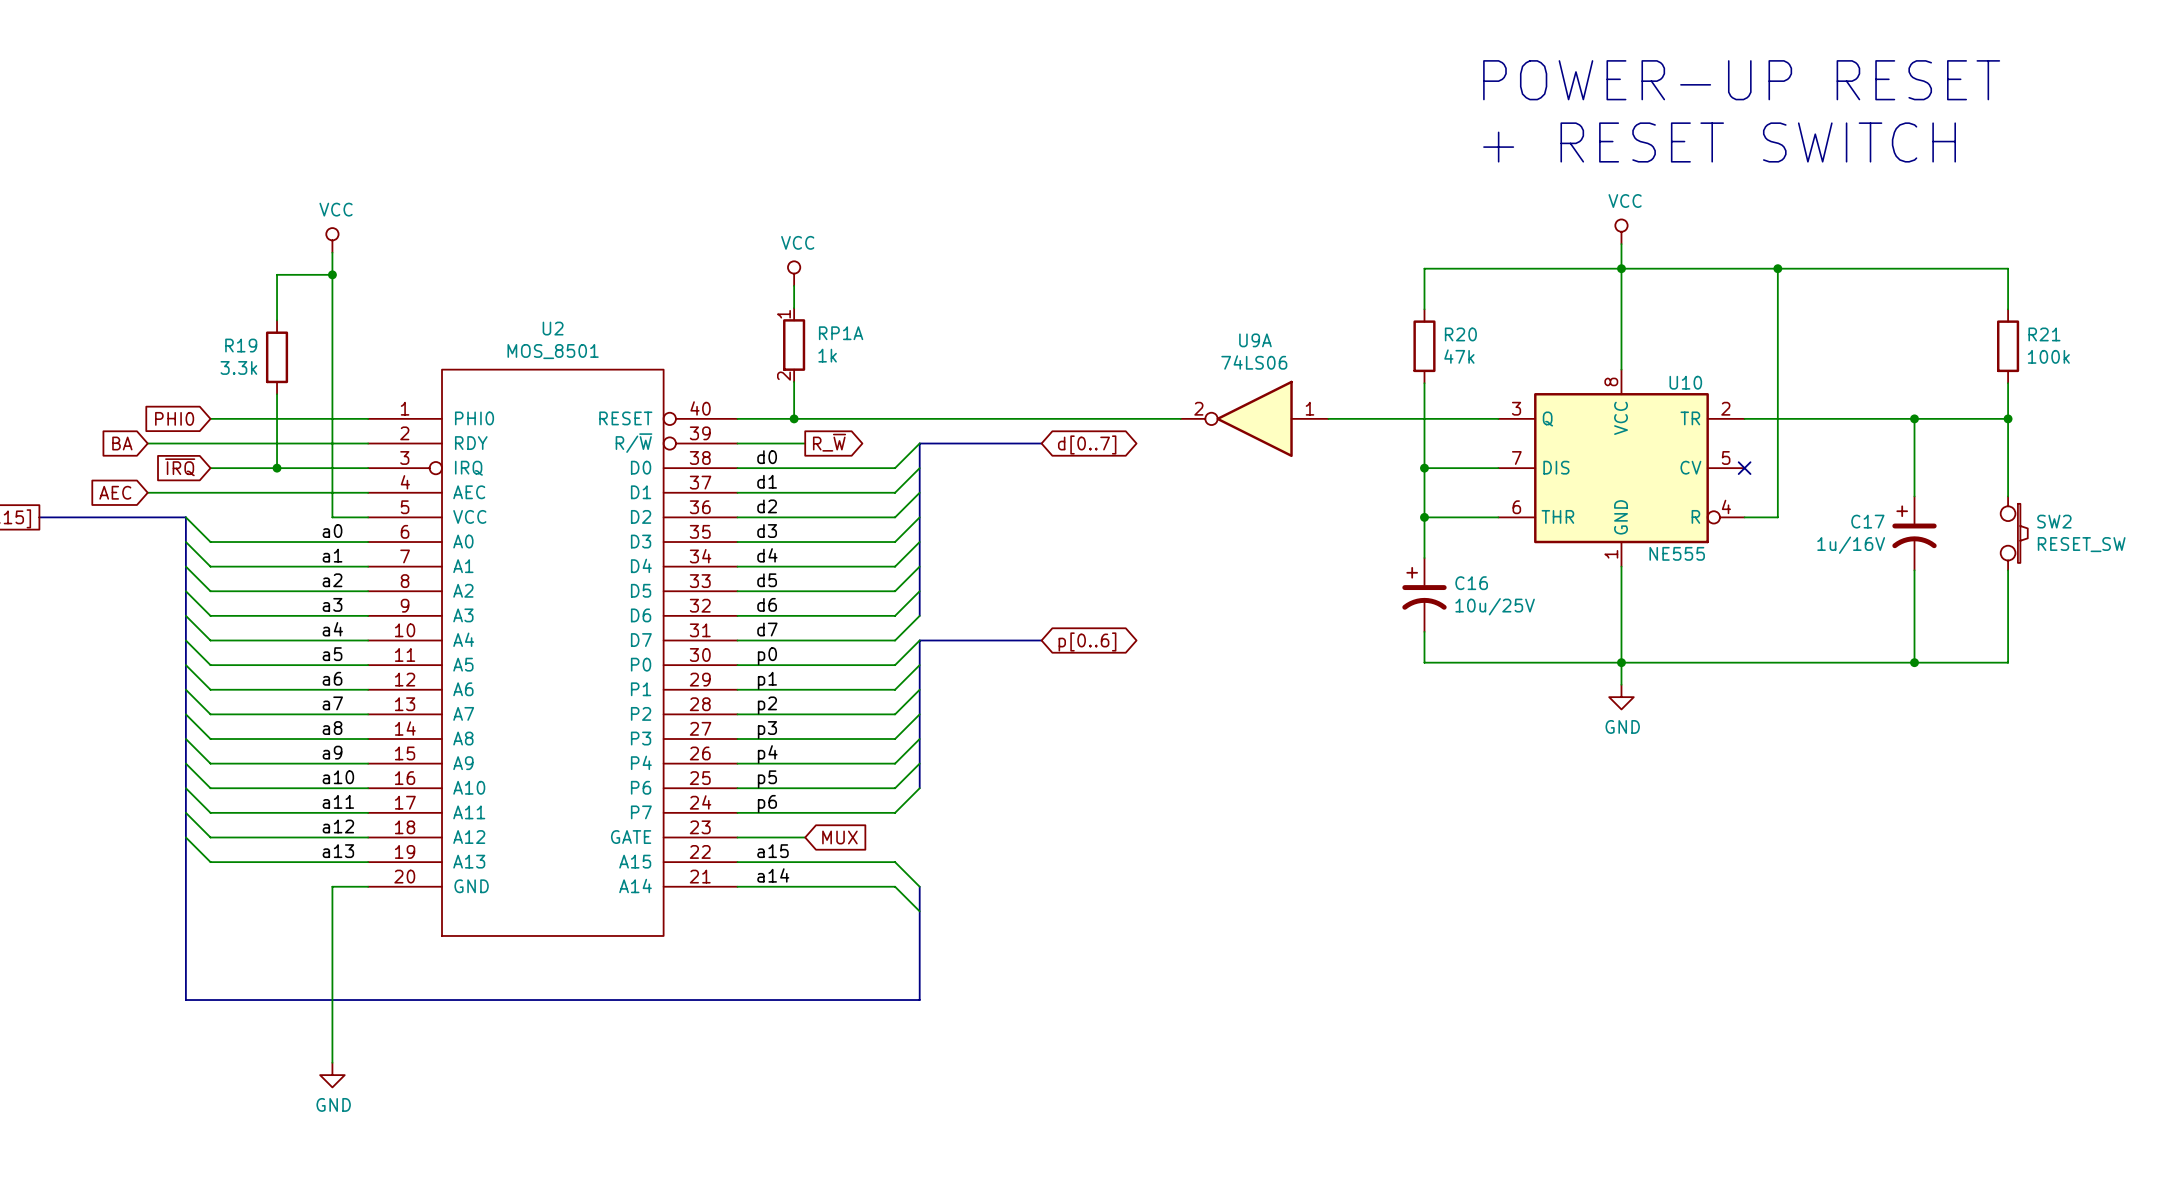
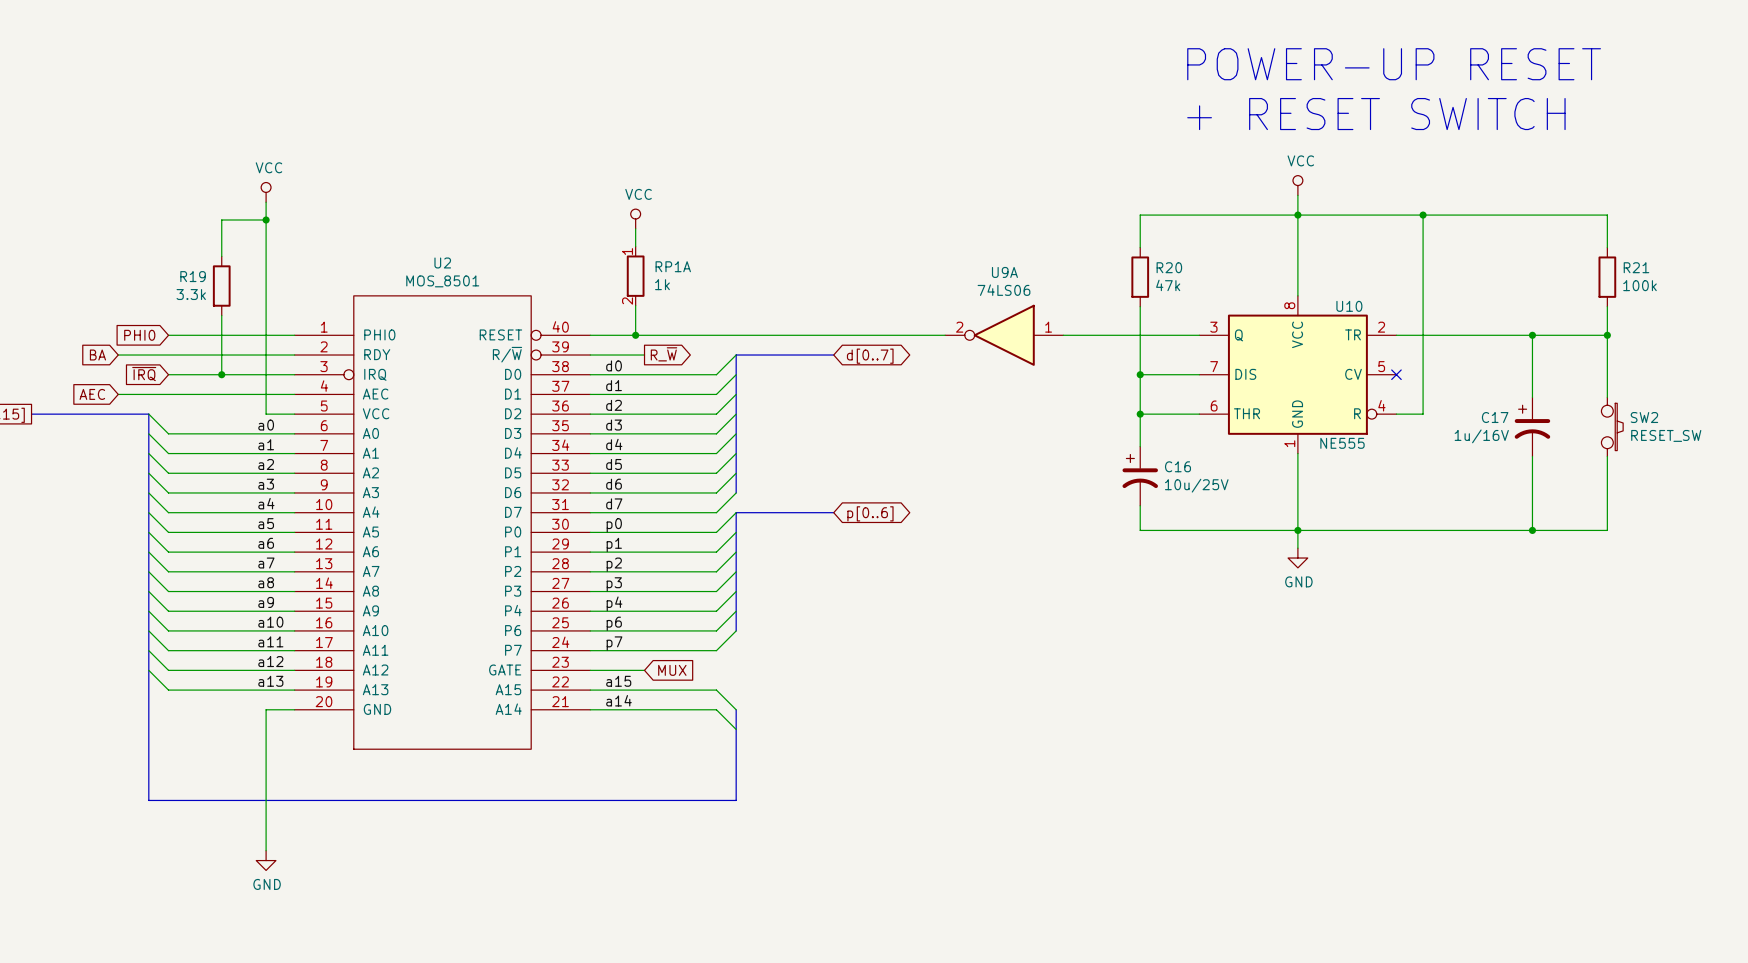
label: p5 (767, 779) -> p6 (614, 623)
label: p6 (767, 803) -> p7 (614, 643)

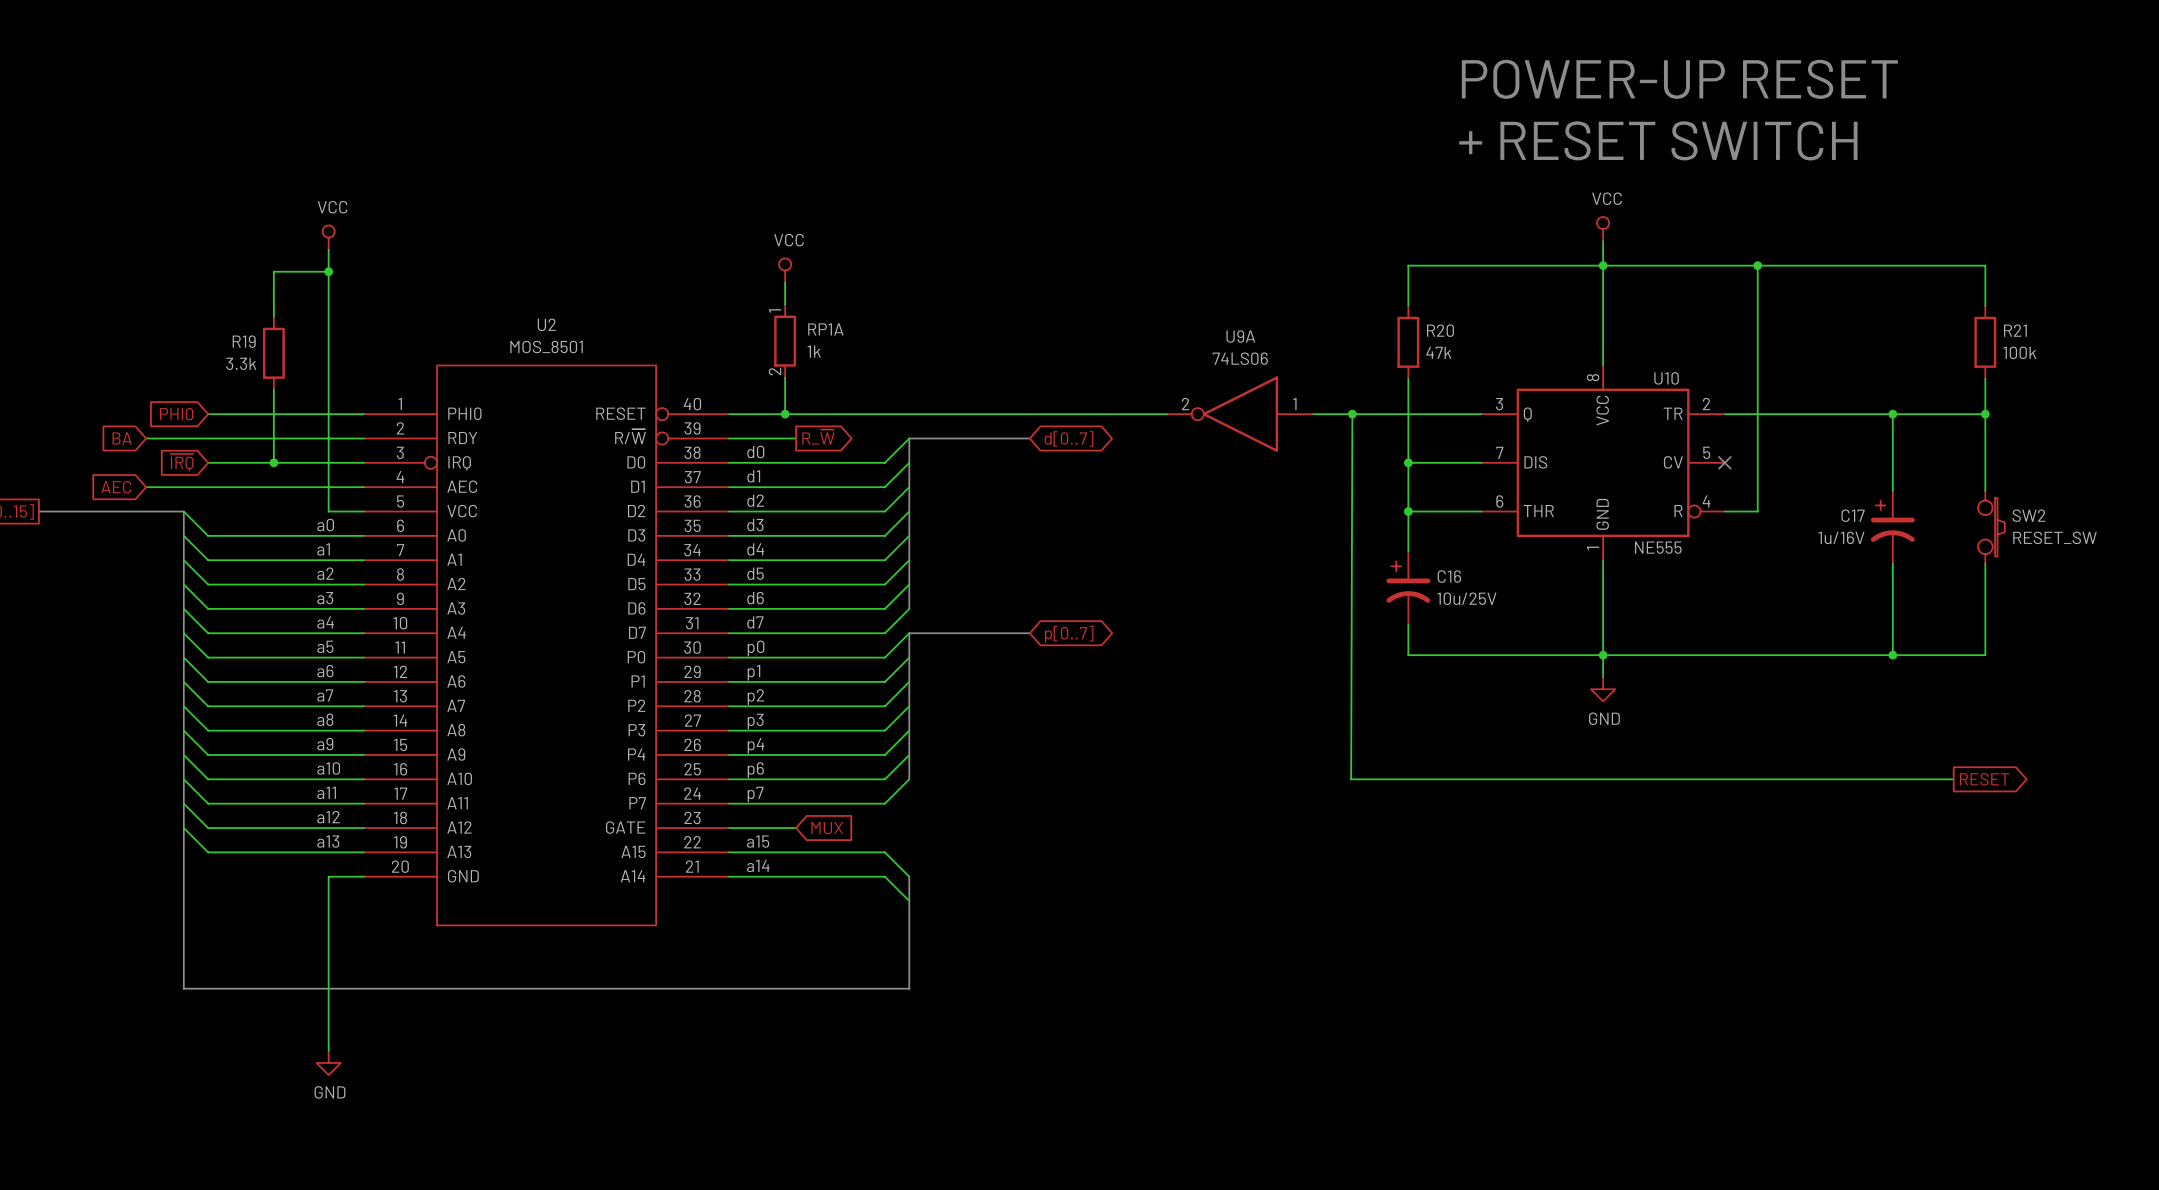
wire: none -> (1352, 414) (1351, 779) (1953, 779)
junction: none -> (1352, 414)
global label: p[0..6] (870, 513) -> p[0..7] (1069, 634)
global label: none -> RESET (1984, 779)

